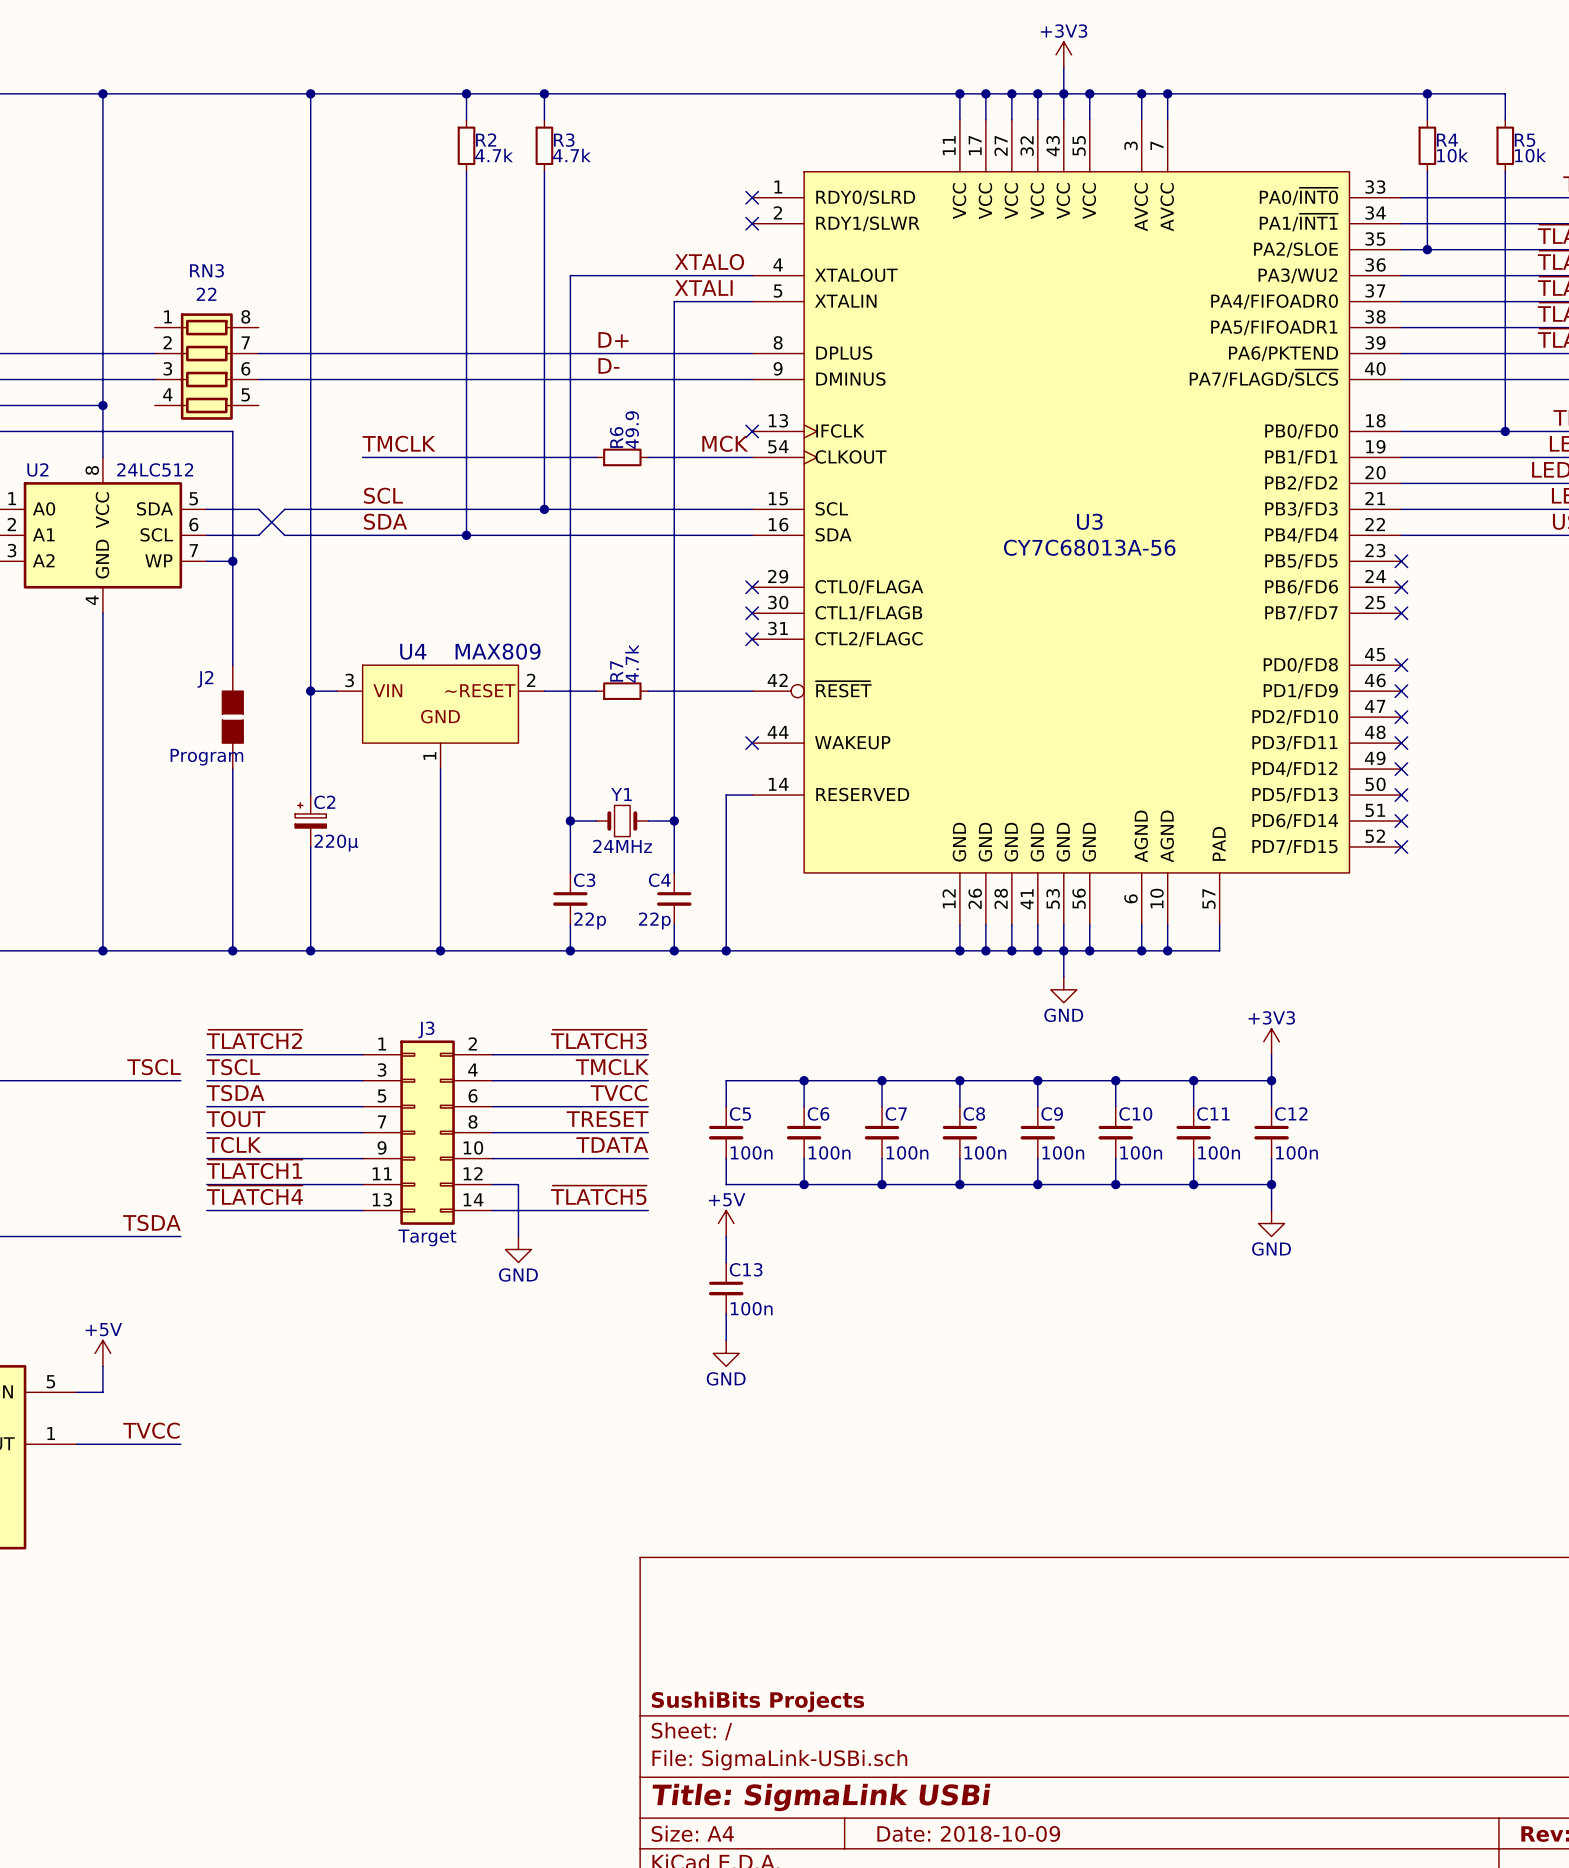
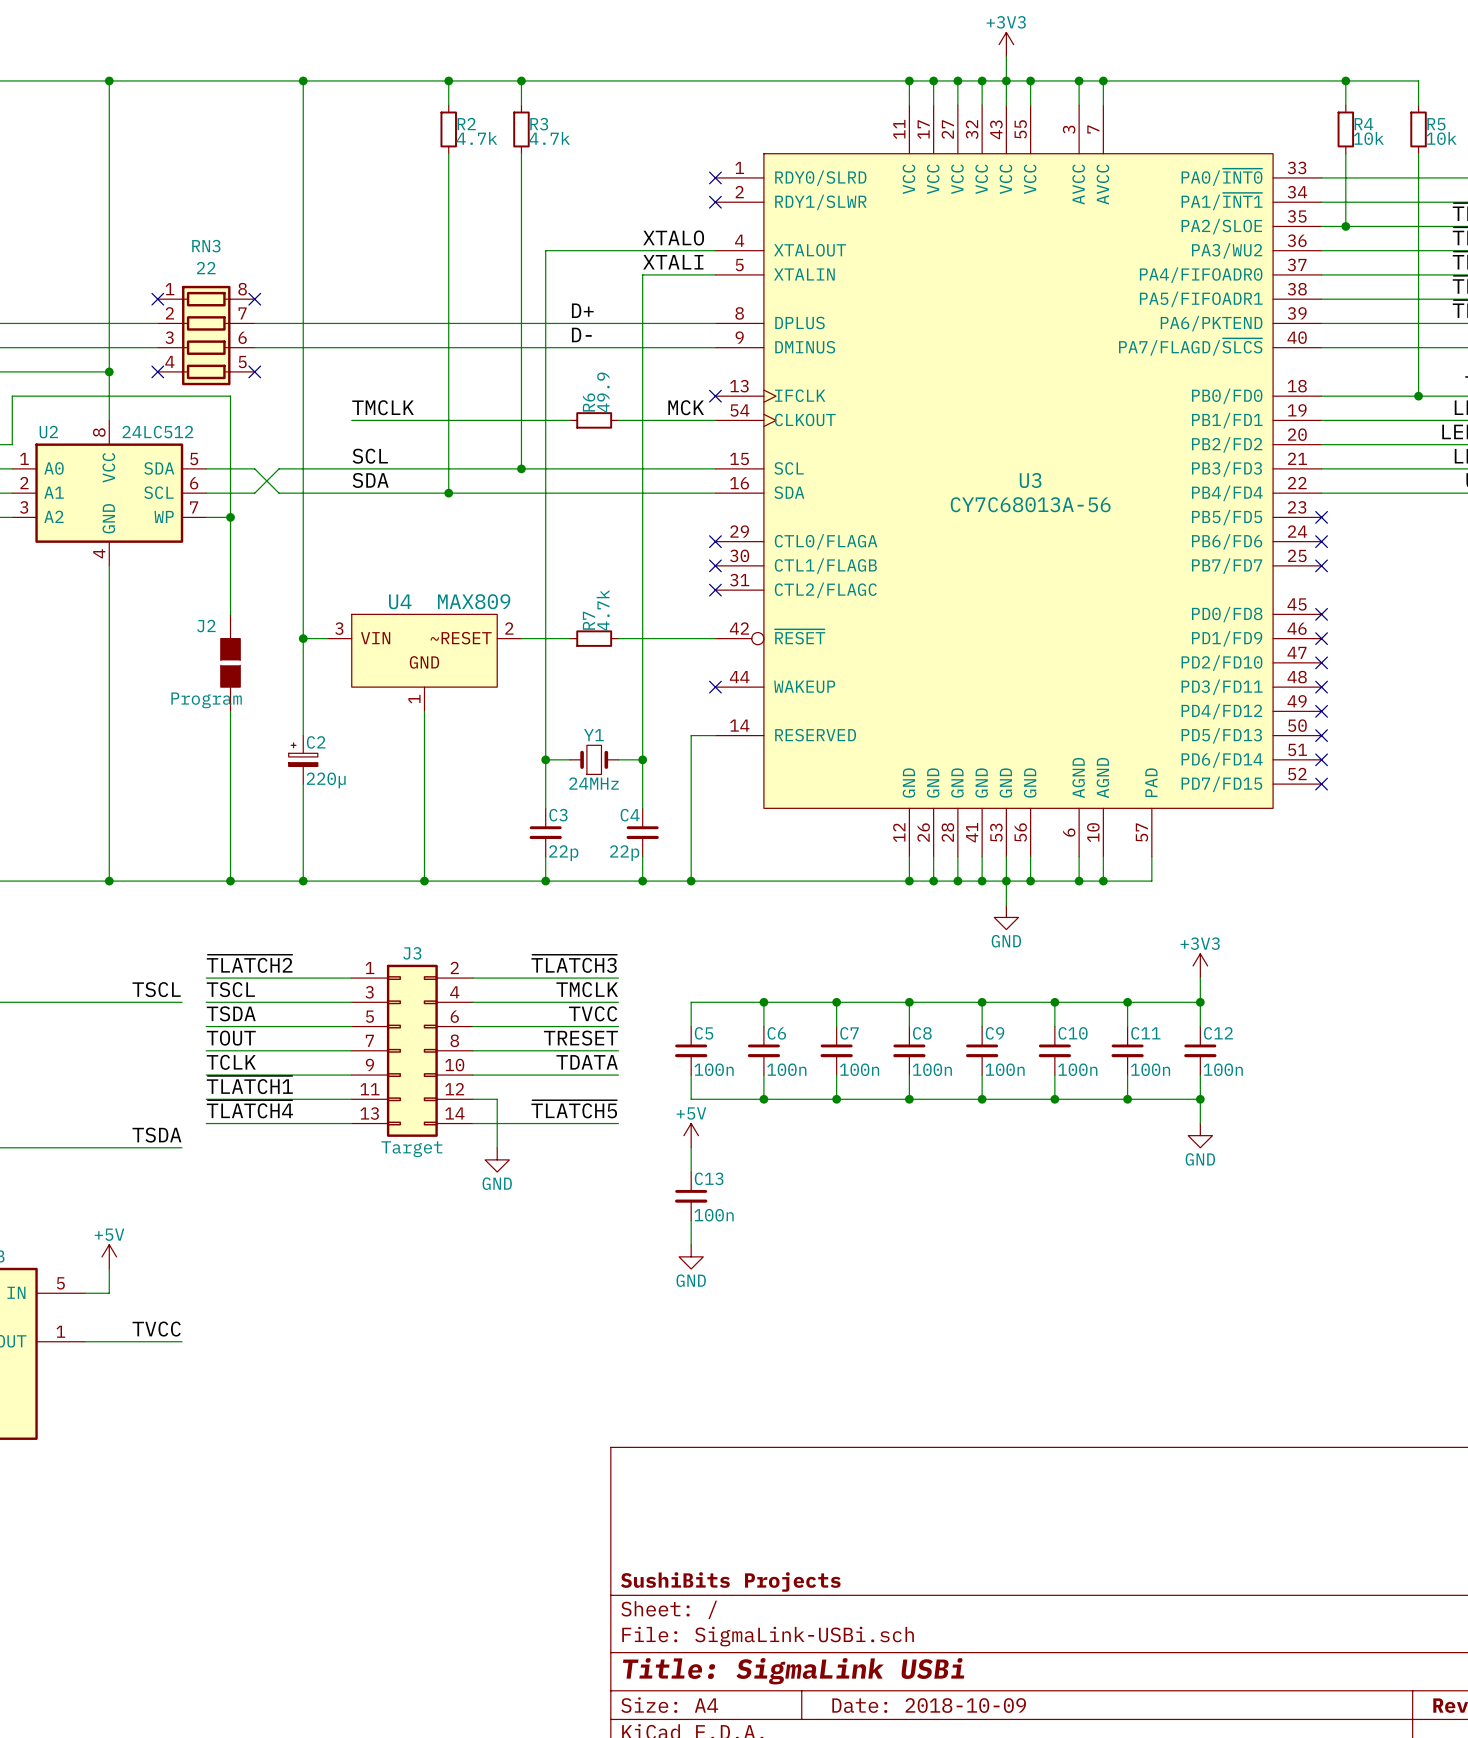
no-connect mark: none -> (157, 299)
no-connect mark: none -> (254, 299)
no-connect mark: none -> (157, 371)
no-connect mark: none -> (254, 371)

